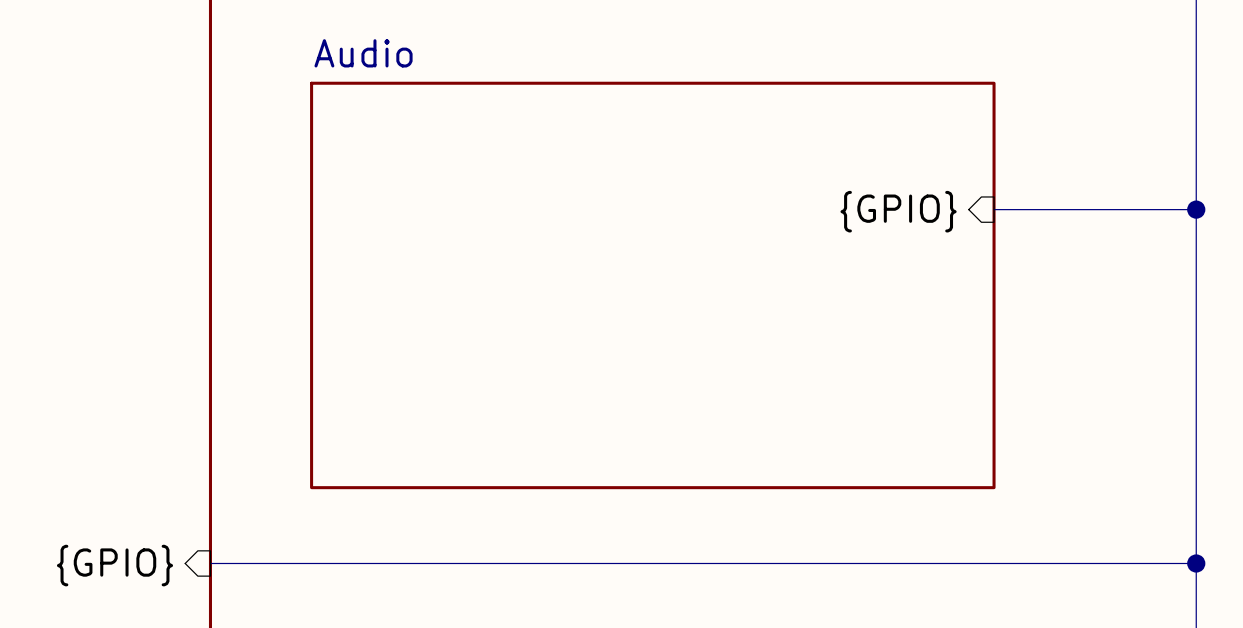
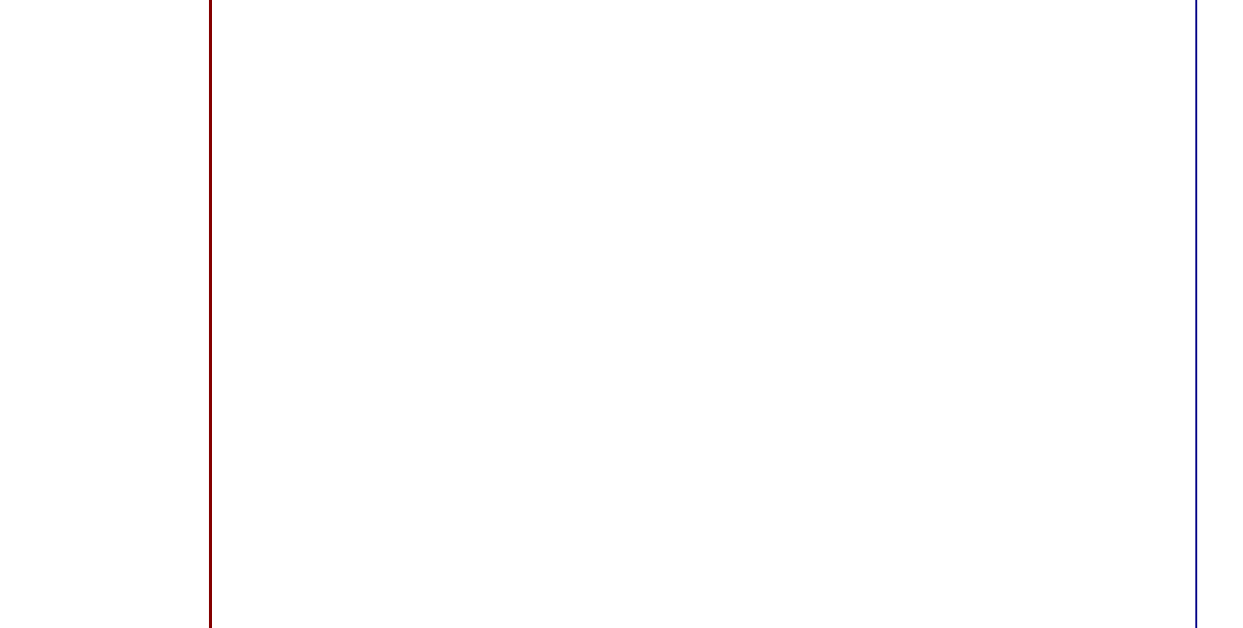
bus: (994, 209) (1196, 209) -> none
junction: (1196, 209) -> none
sheet pin: {GPIO} (898, 211) -> none
sheet Audio: (652, 285) -> none
bus: (210, 563) (1196, 563) -> none
junction: (1196, 563) -> none
sheet pin: {GPIO} (114, 565) -> none

